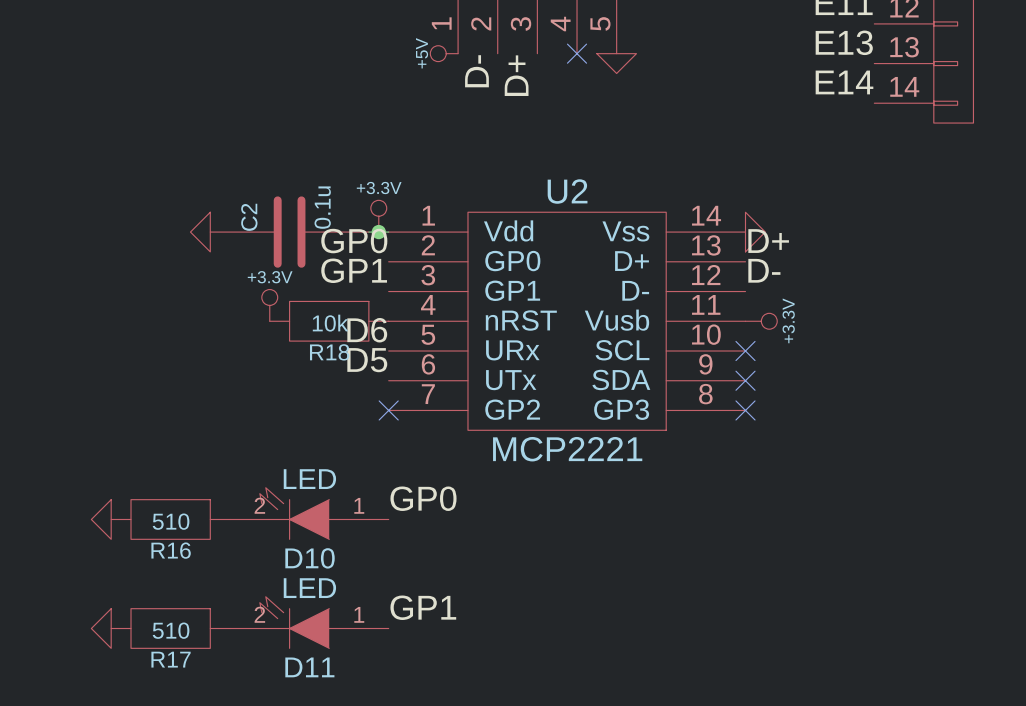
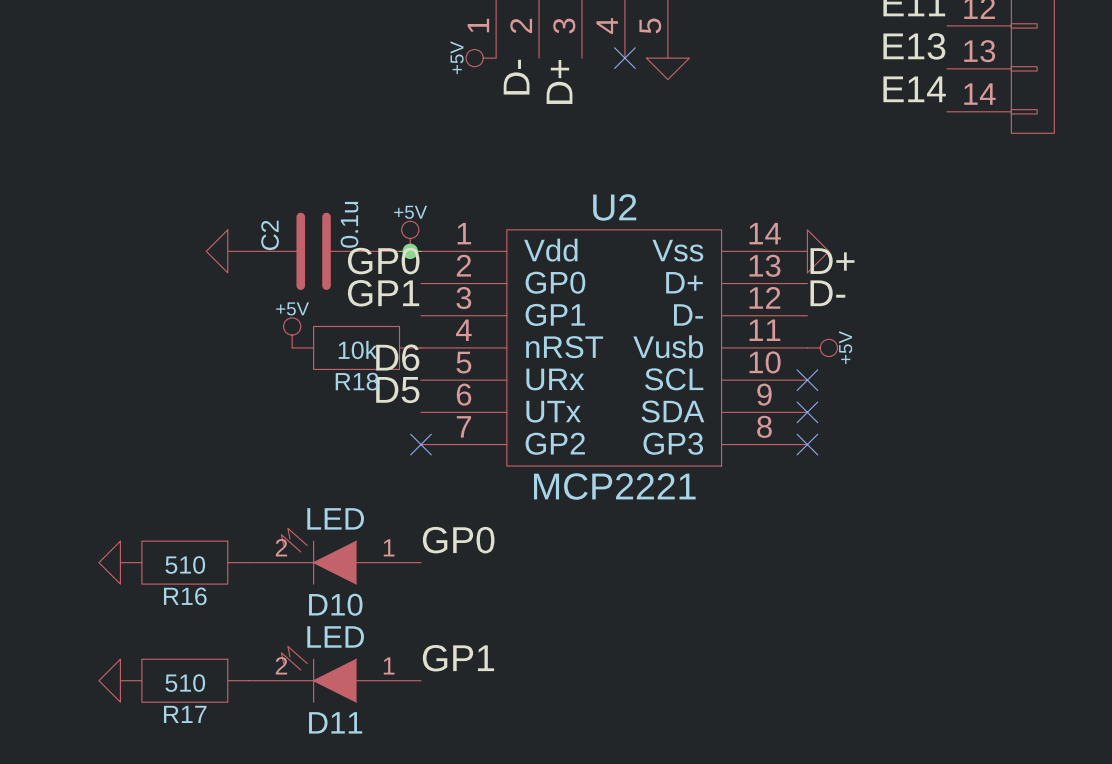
power symbol: +3.3V (378, 216) -> +5V (410, 236)
power symbol: +3.3V (269, 305) -> +5V (292, 332)
power symbol: +3.3V (761, 321) -> +5V (822, 347)

